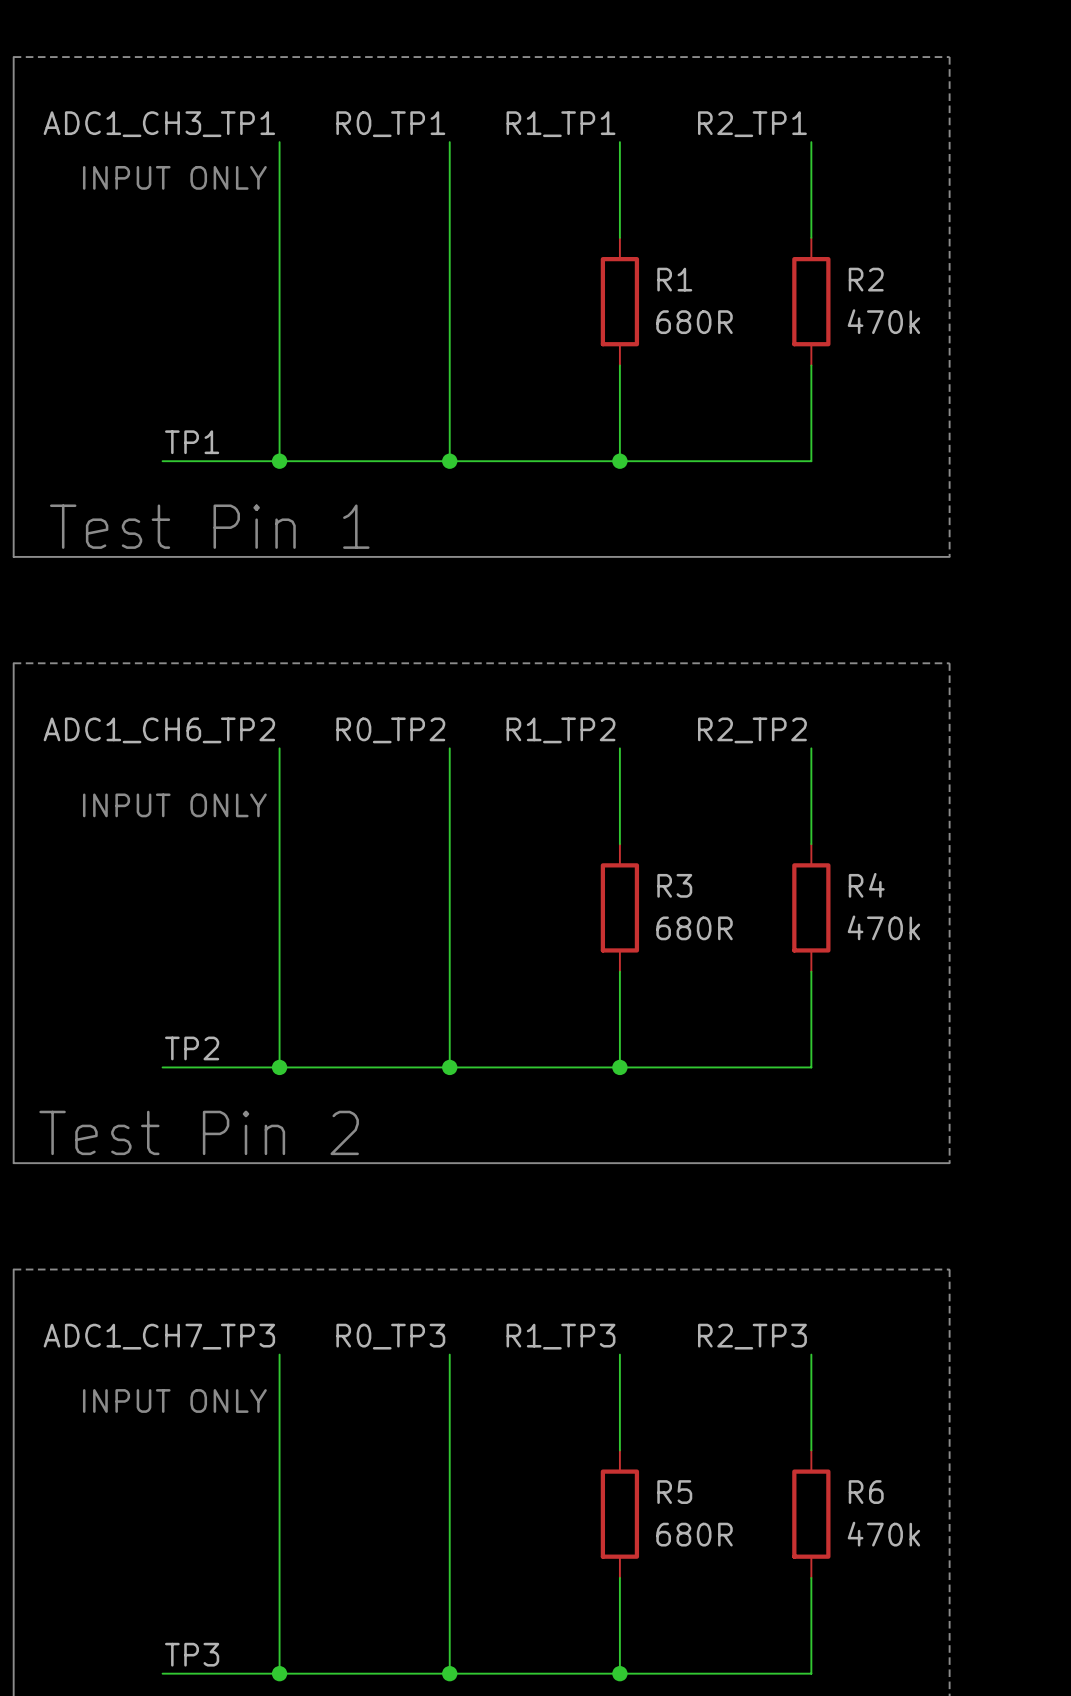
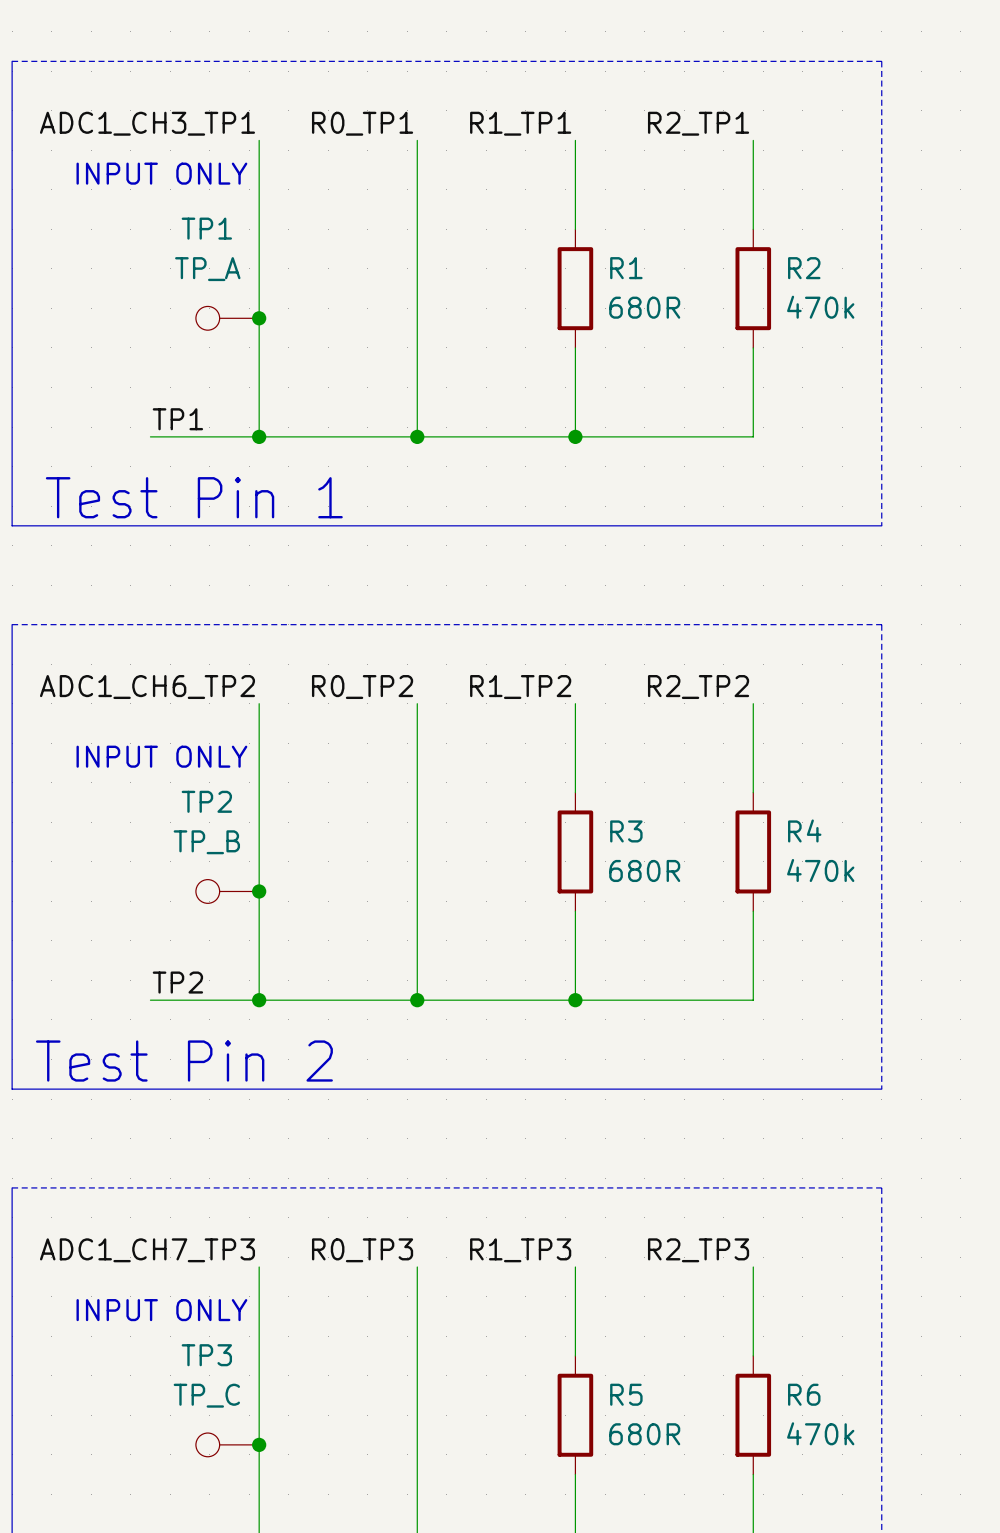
TP1: none -> TP_A (227, 318)
junction: none -> (259, 318)
TP2: none -> TP_B (227, 891)
junction: none -> (259, 891)
TP3: none -> TP_C (227, 1444)
junction: none -> (259, 1444)

